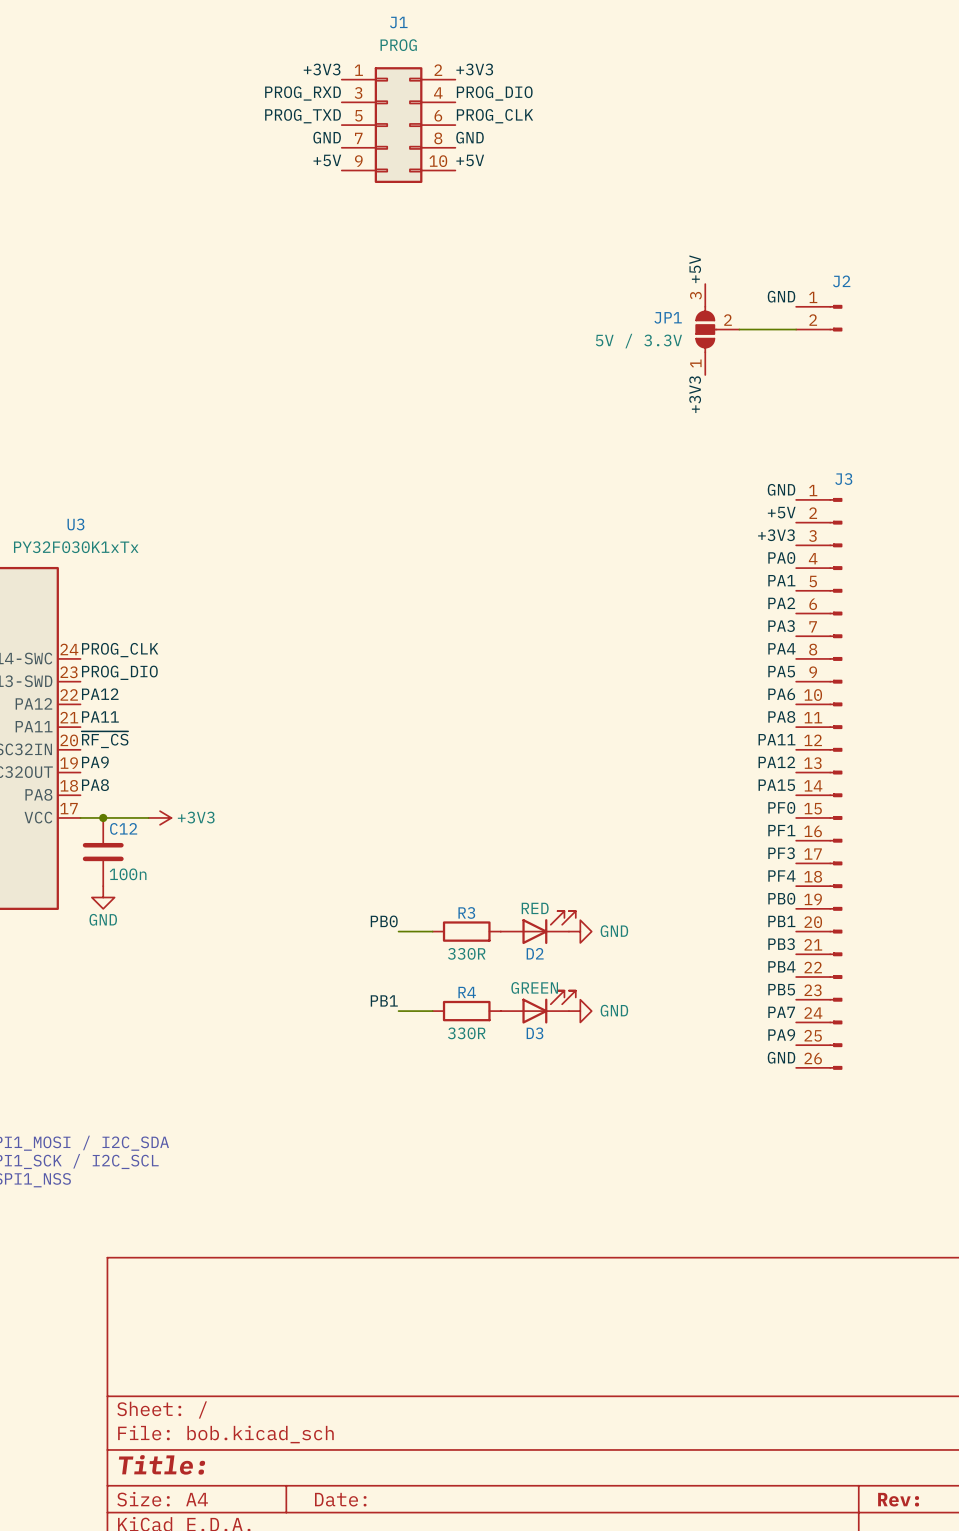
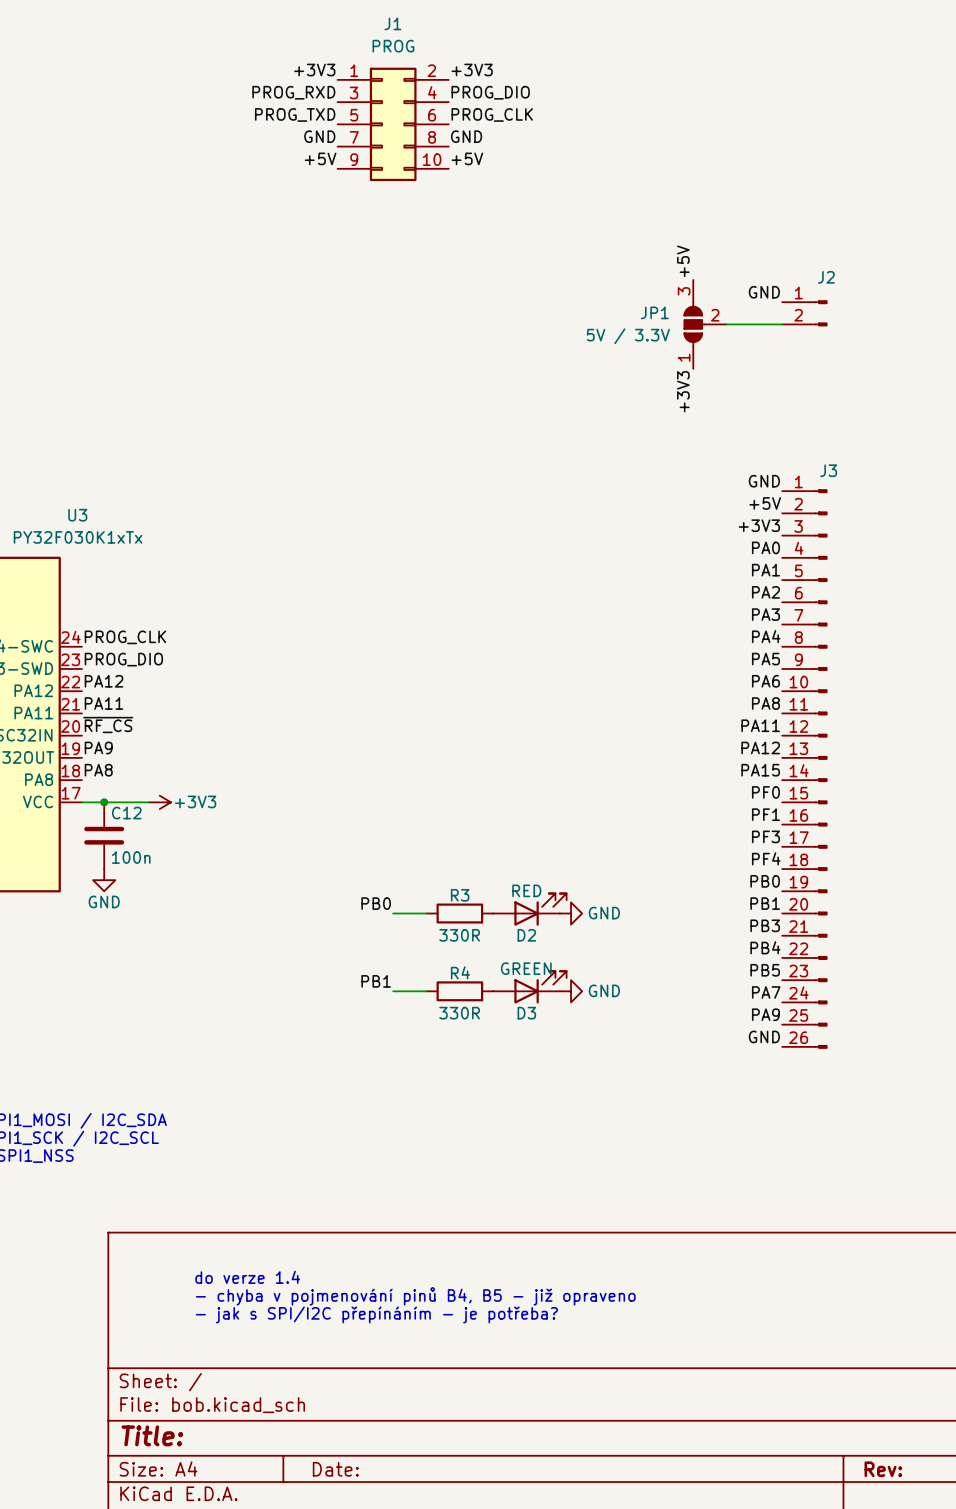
text: none -> do verze 1.4 (247, 1277)
text: none -> - chyba v pojmenování pinů B4, B5 - již opraveno (415, 1296)
text: none -> - jak s SPI/I2C přepínáním - je potřeba? (376, 1314)

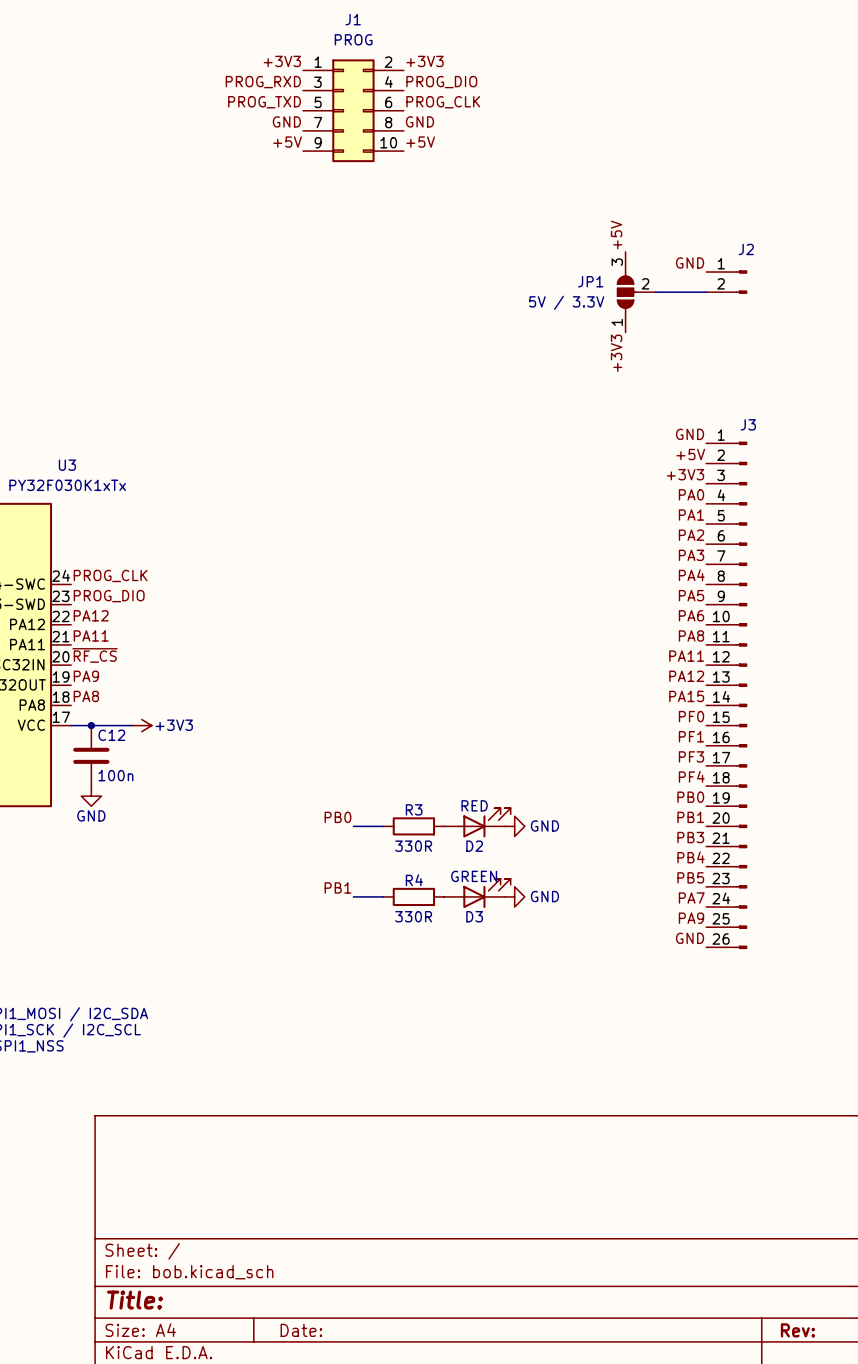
text: do verze 1.4 (247, 1277) -> none
text: - chyba v pojmenování pinů B4, B5 - již opraveno (415, 1296) -> none
text: - jak s SPI/I2C přepínáním - je potřeba? (376, 1314) -> none

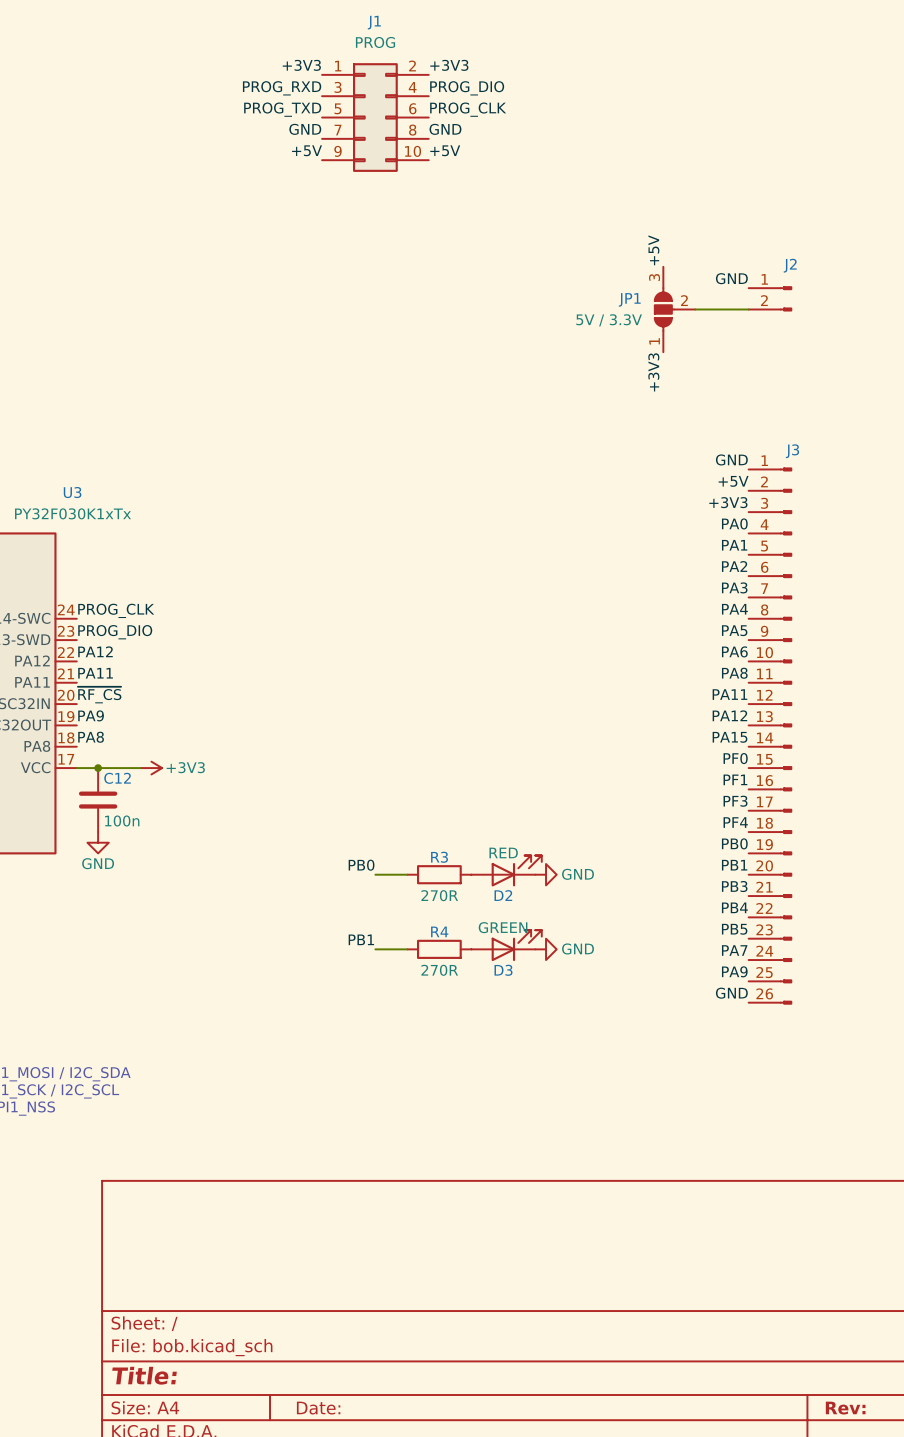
R3 value: 330R (413, 846) -> 270R (439, 895)
R4 value: 330R (413, 916) -> 270R (439, 970)

